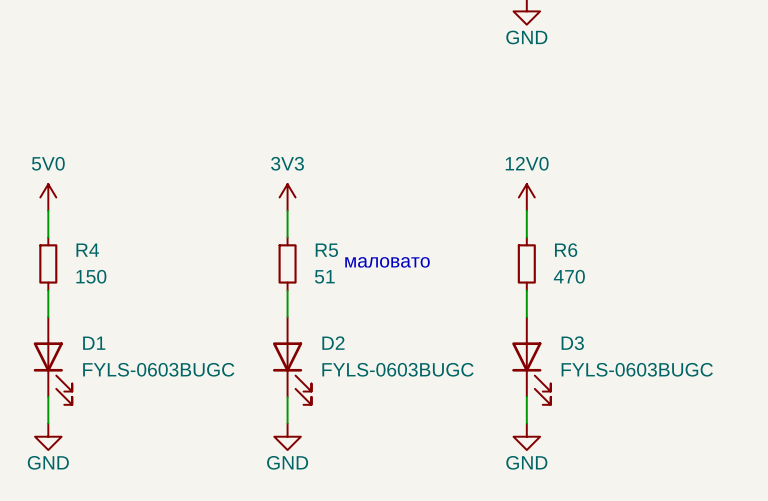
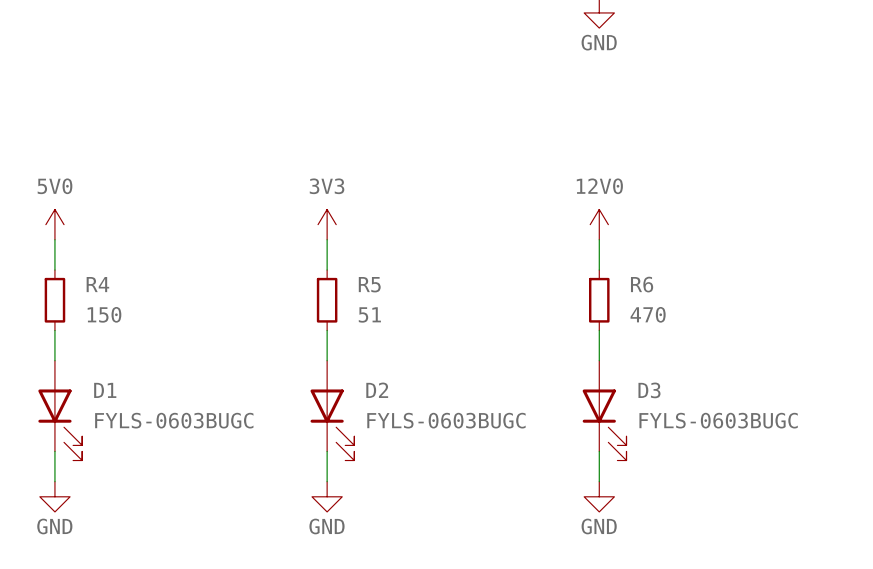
text: маловато (387, 262) -> none

